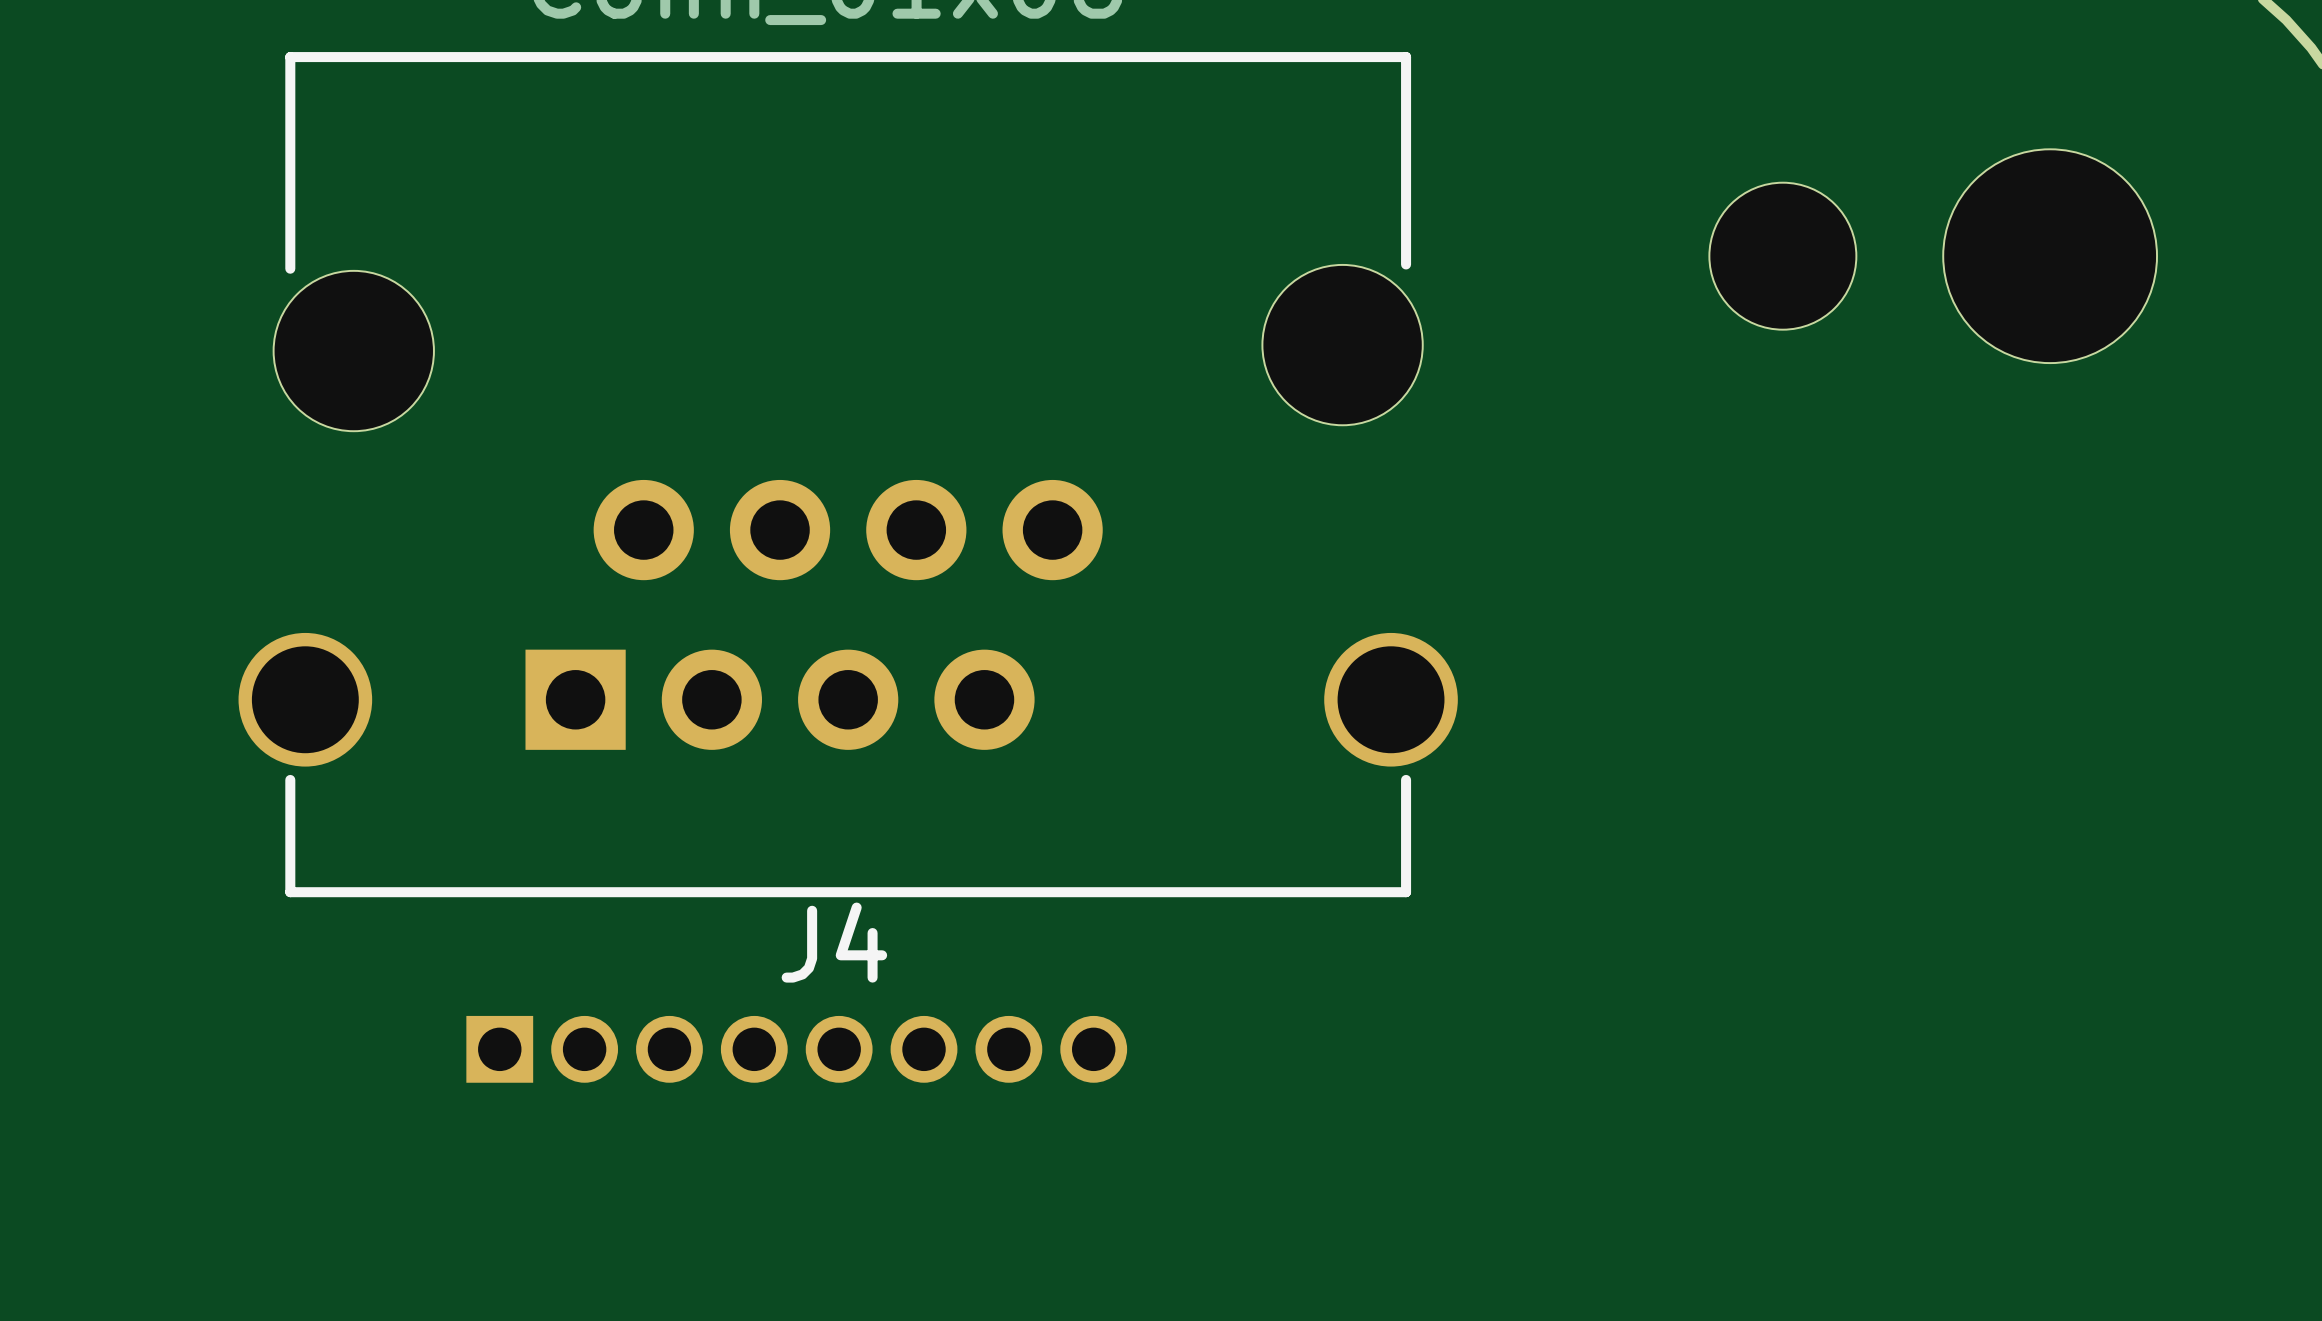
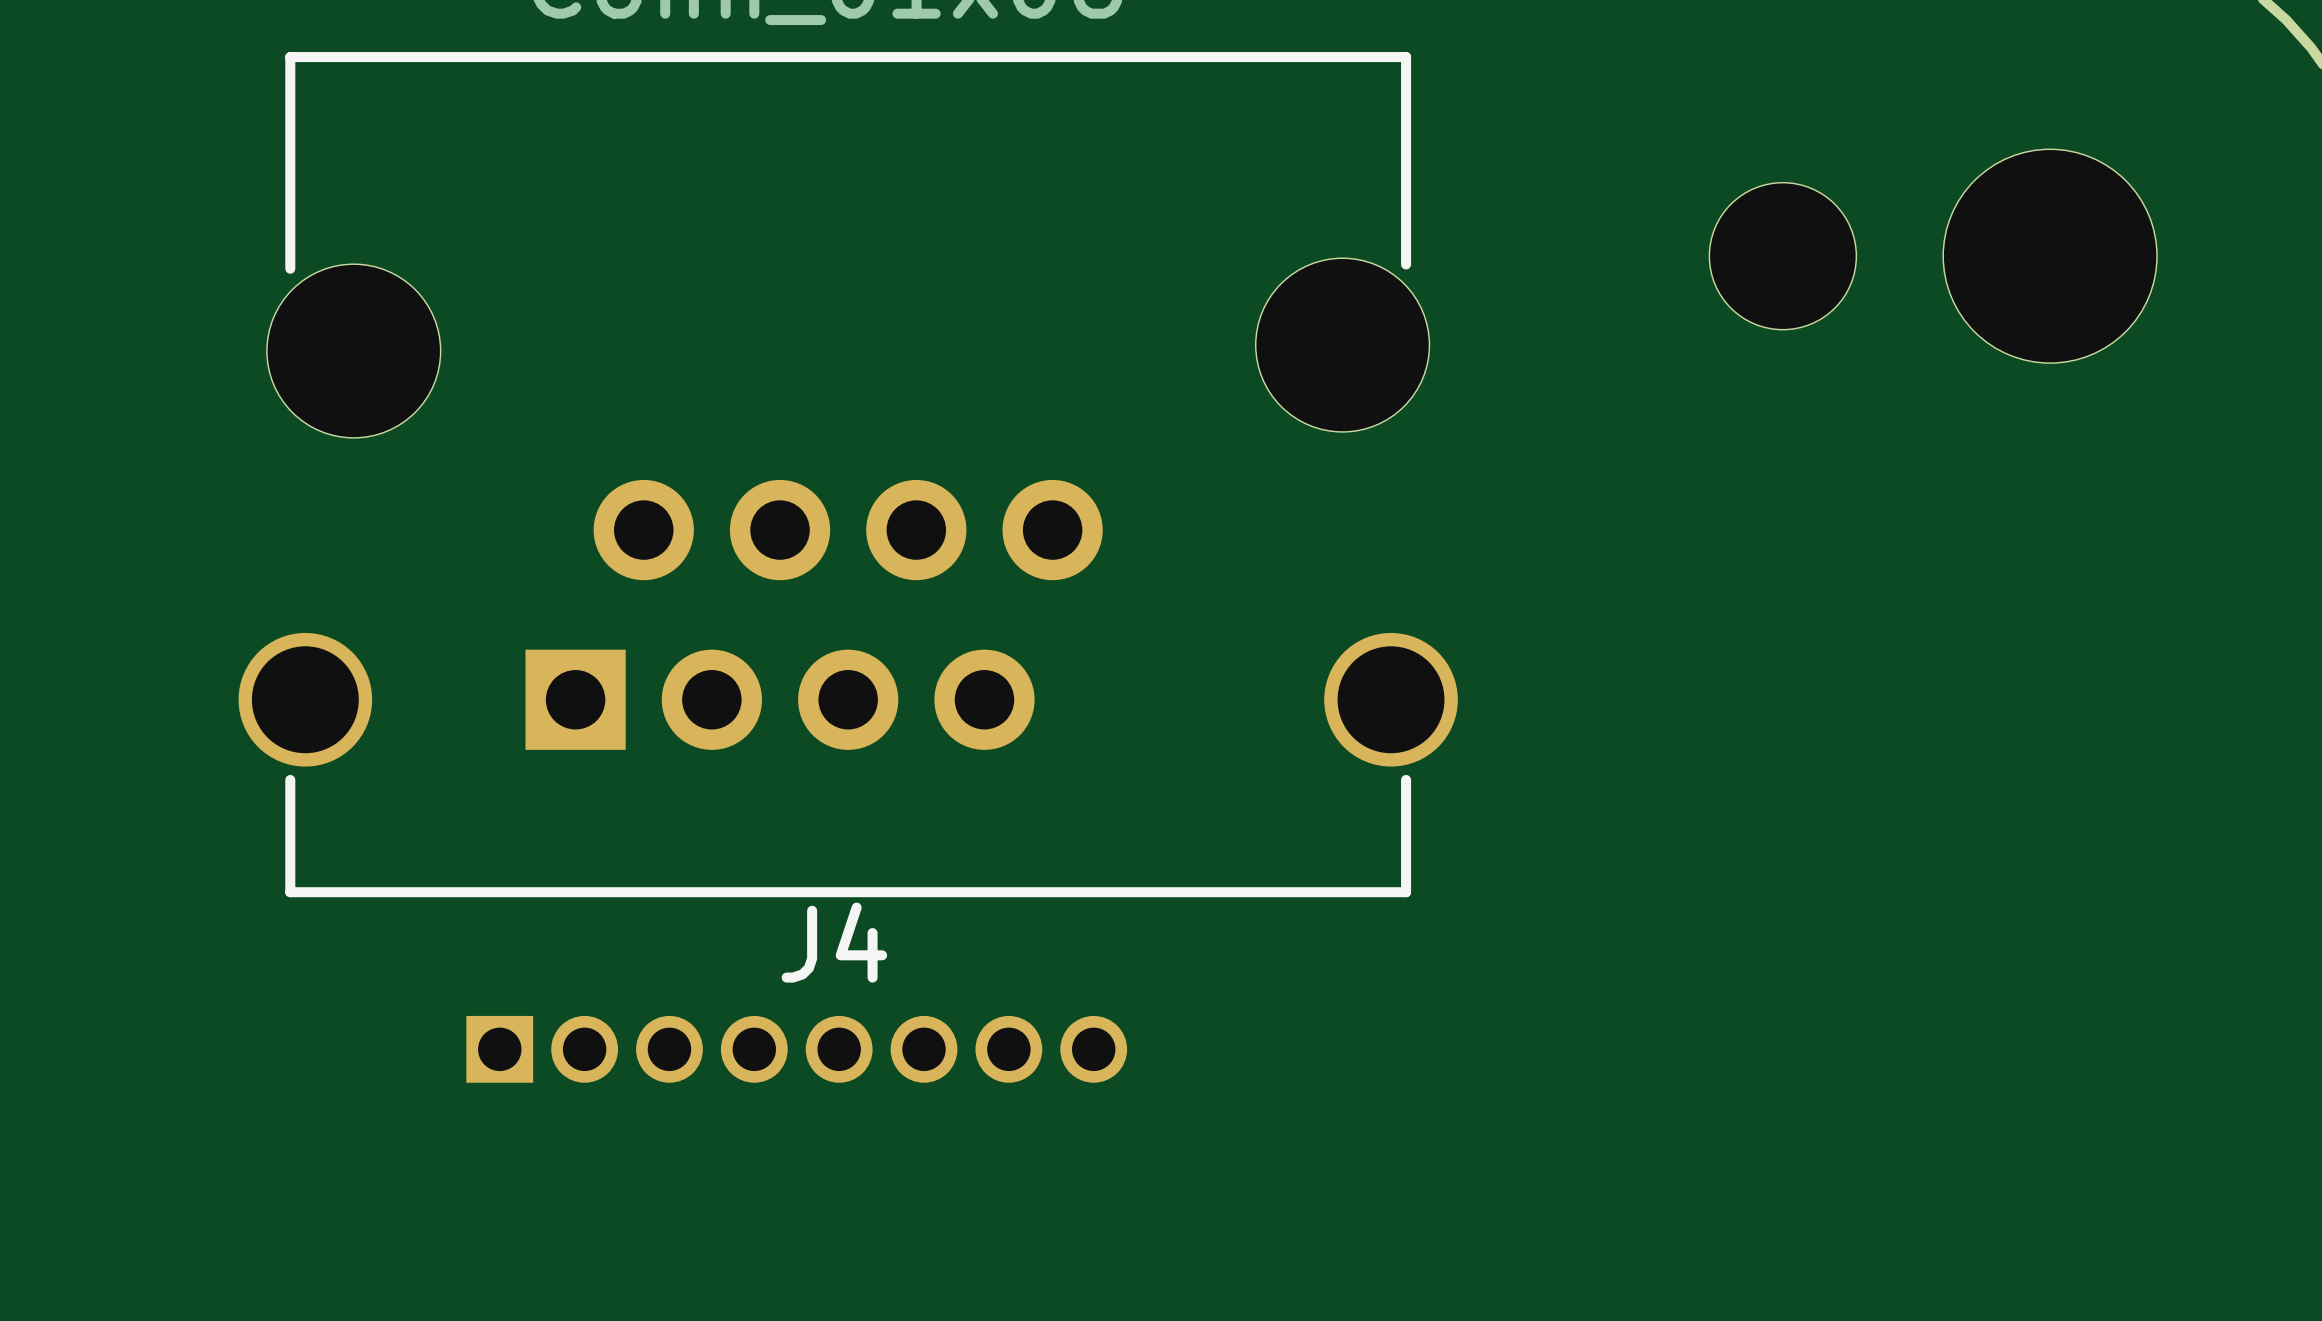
J4 footprint: [238, 52, 1458, 898] -> [238, 52, 1458, 898]

